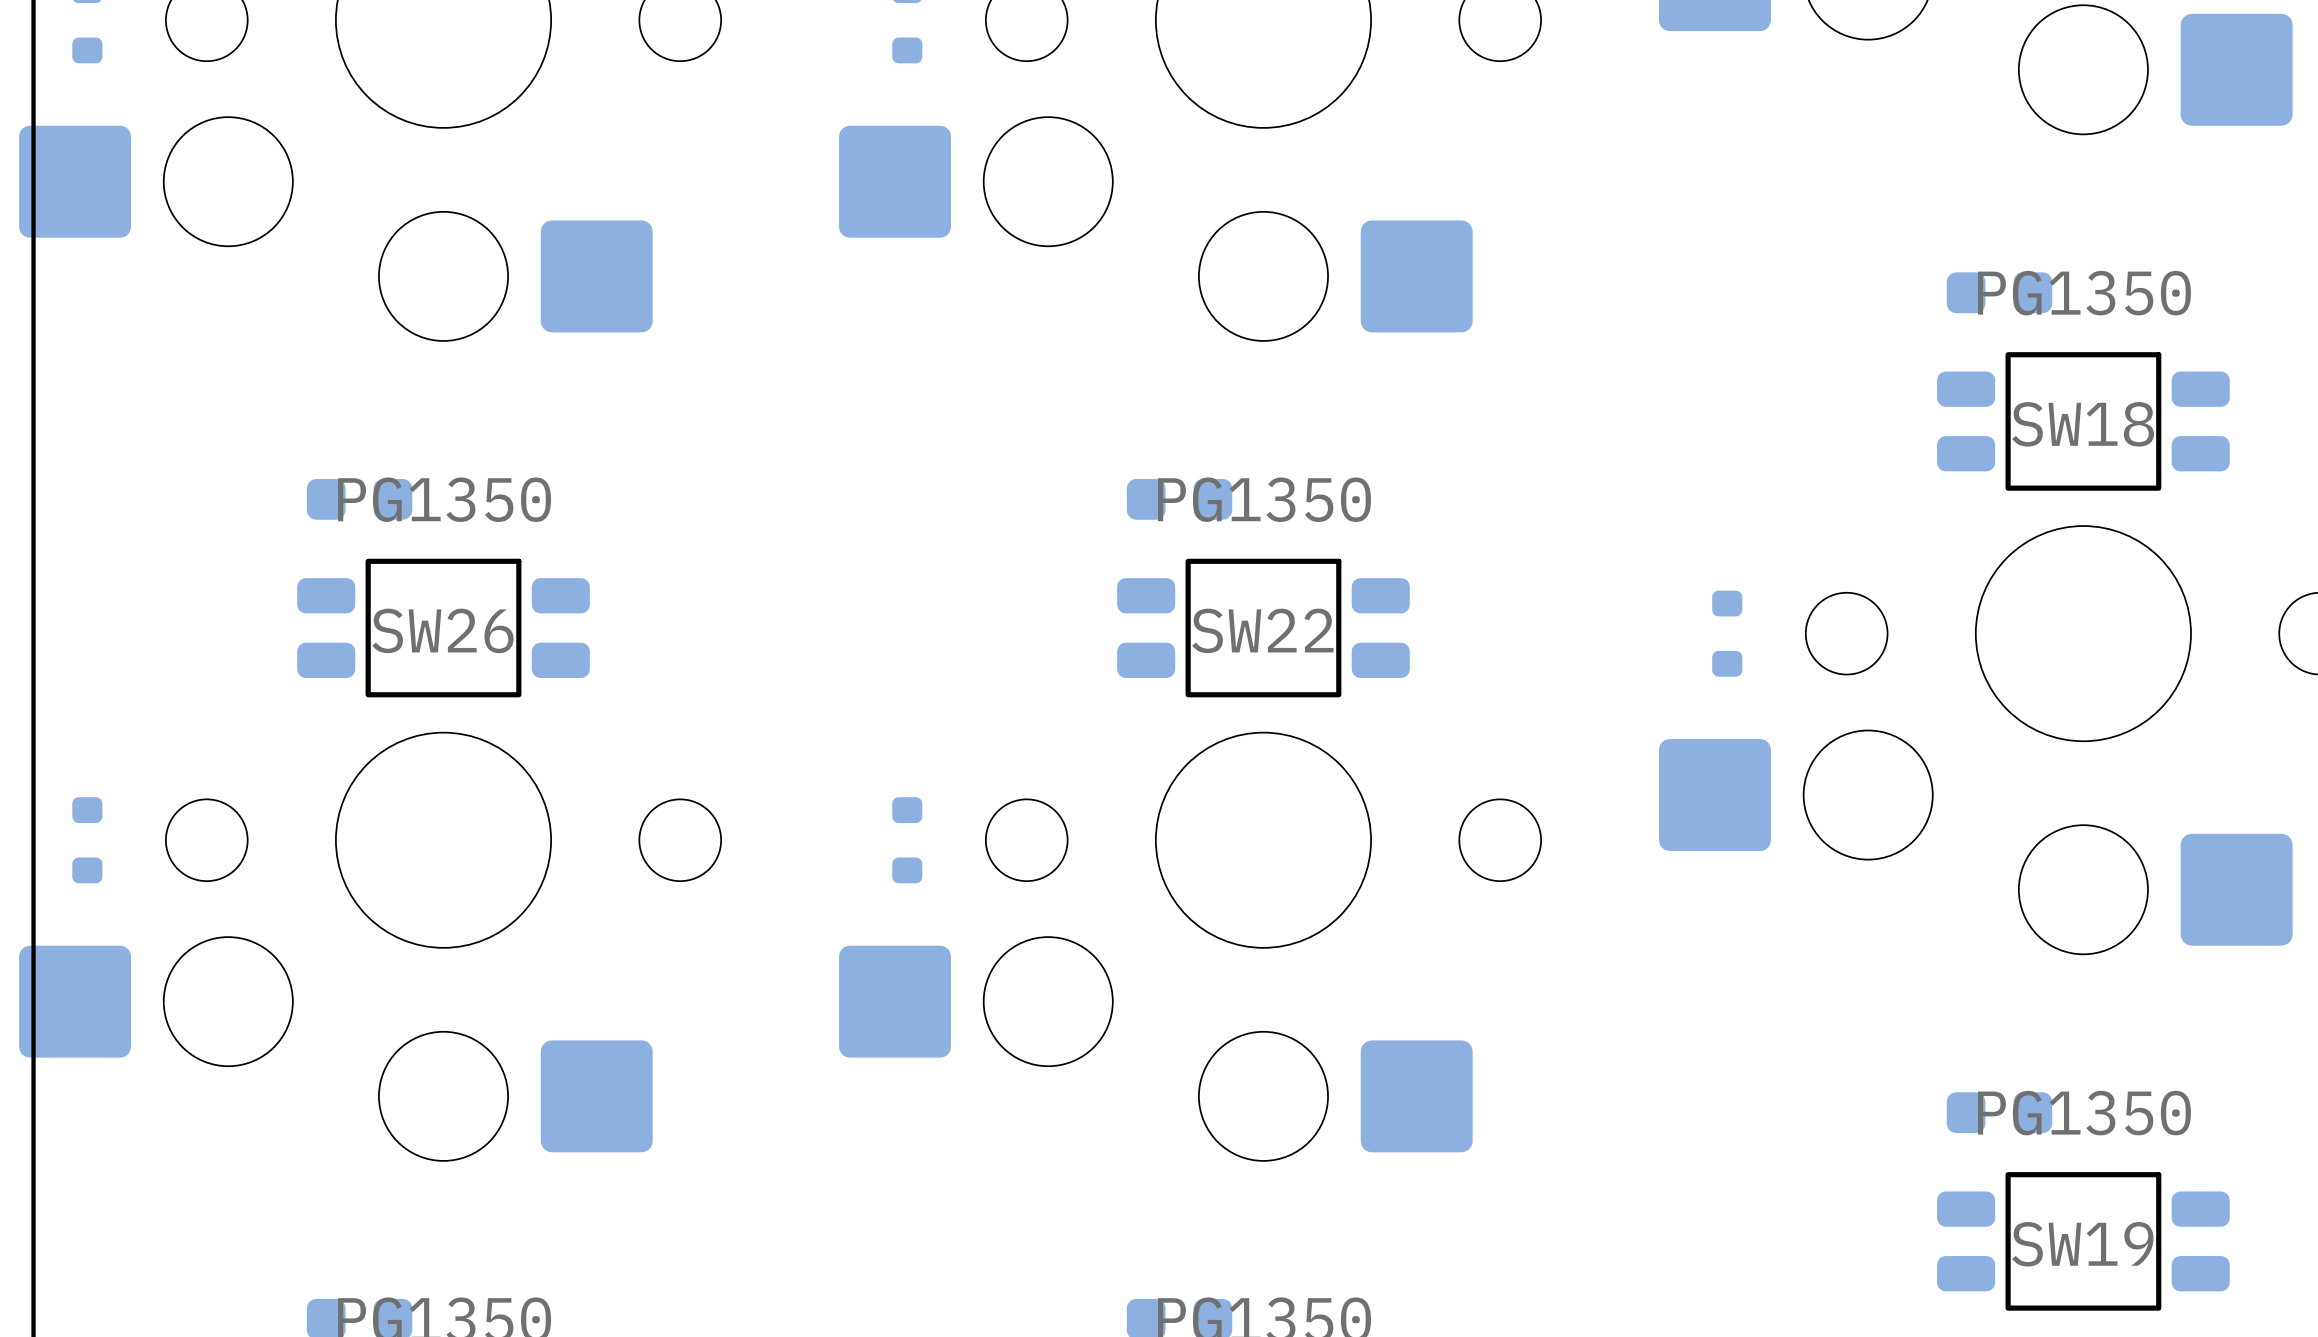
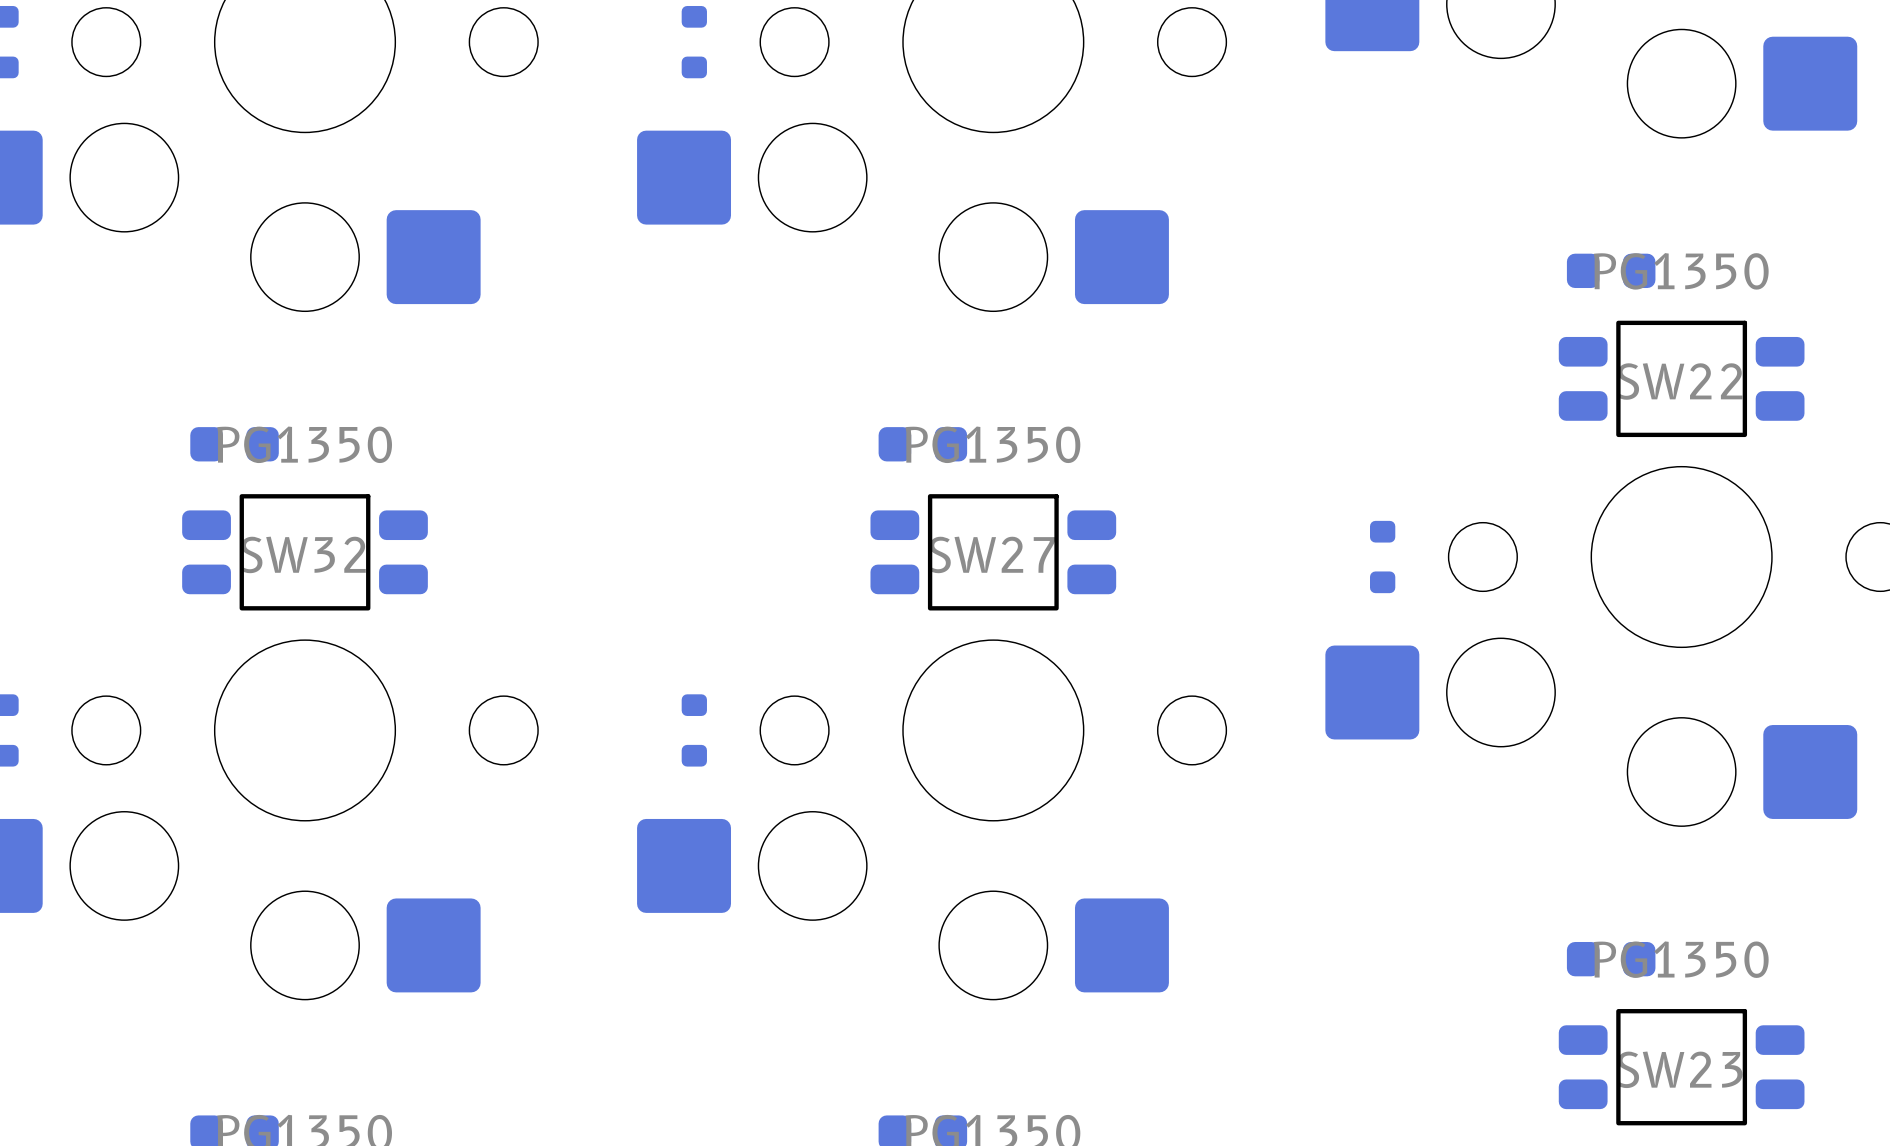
SW18 name: SW18 (2083, 424) -> SW22 (1679, 381)
SW26 name: SW26 (442, 630) -> SW32 (303, 554)
SW22 name: SW22 (1262, 630) -> SW27 (991, 554)
SW19 name: SW19 (2082, 1244) -> SW23 (1679, 1069)

